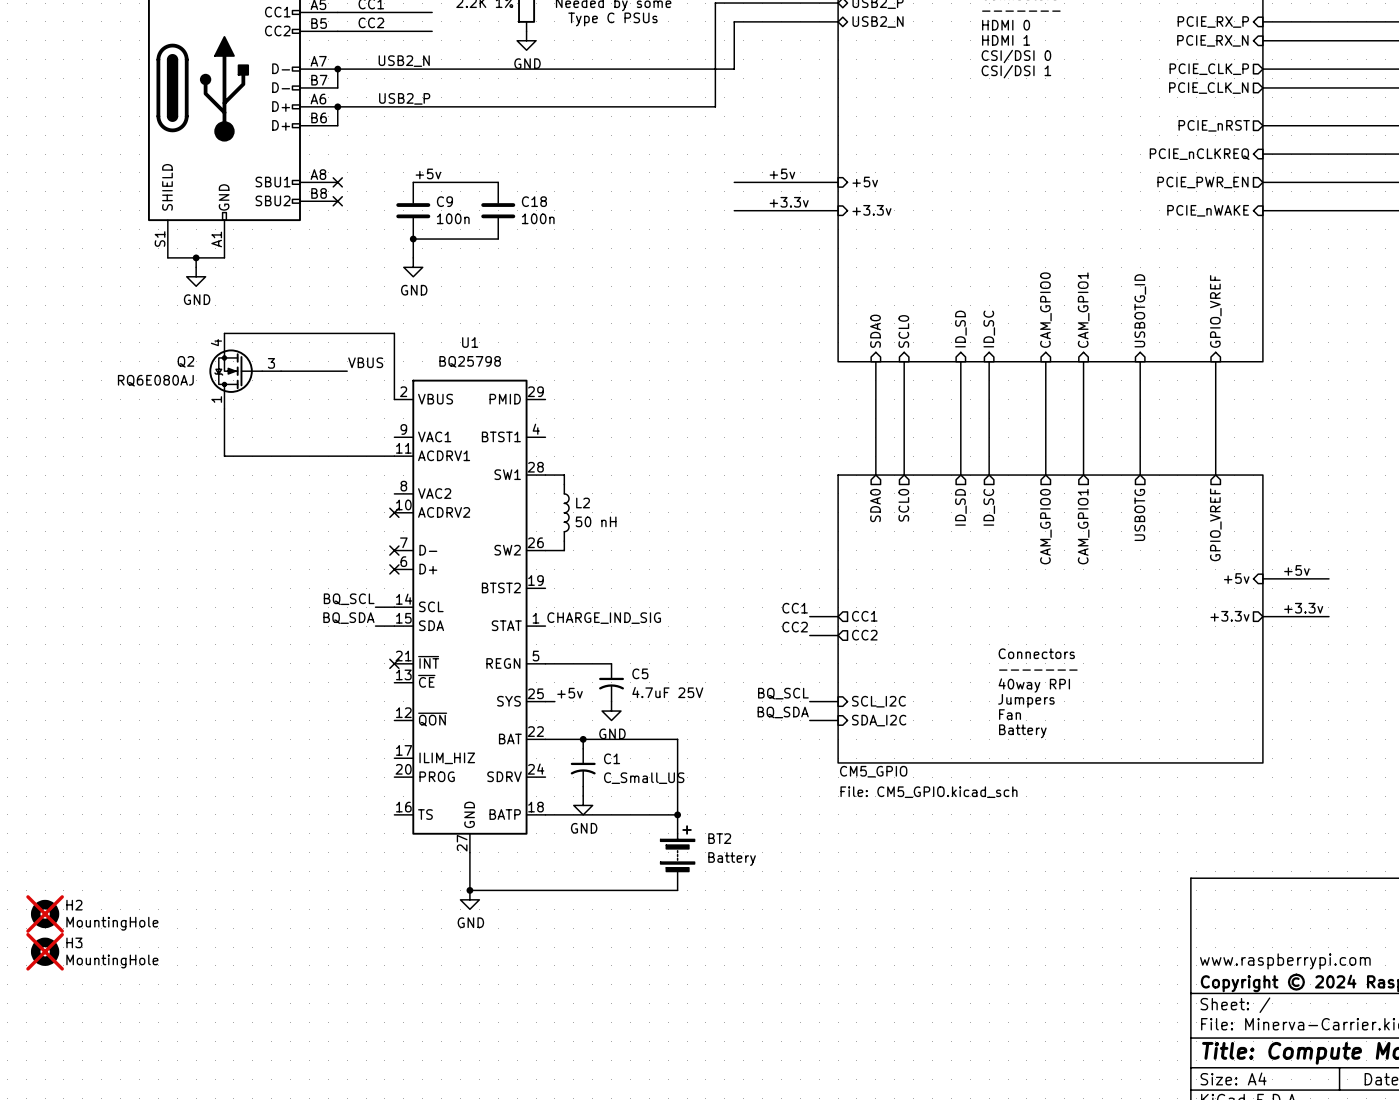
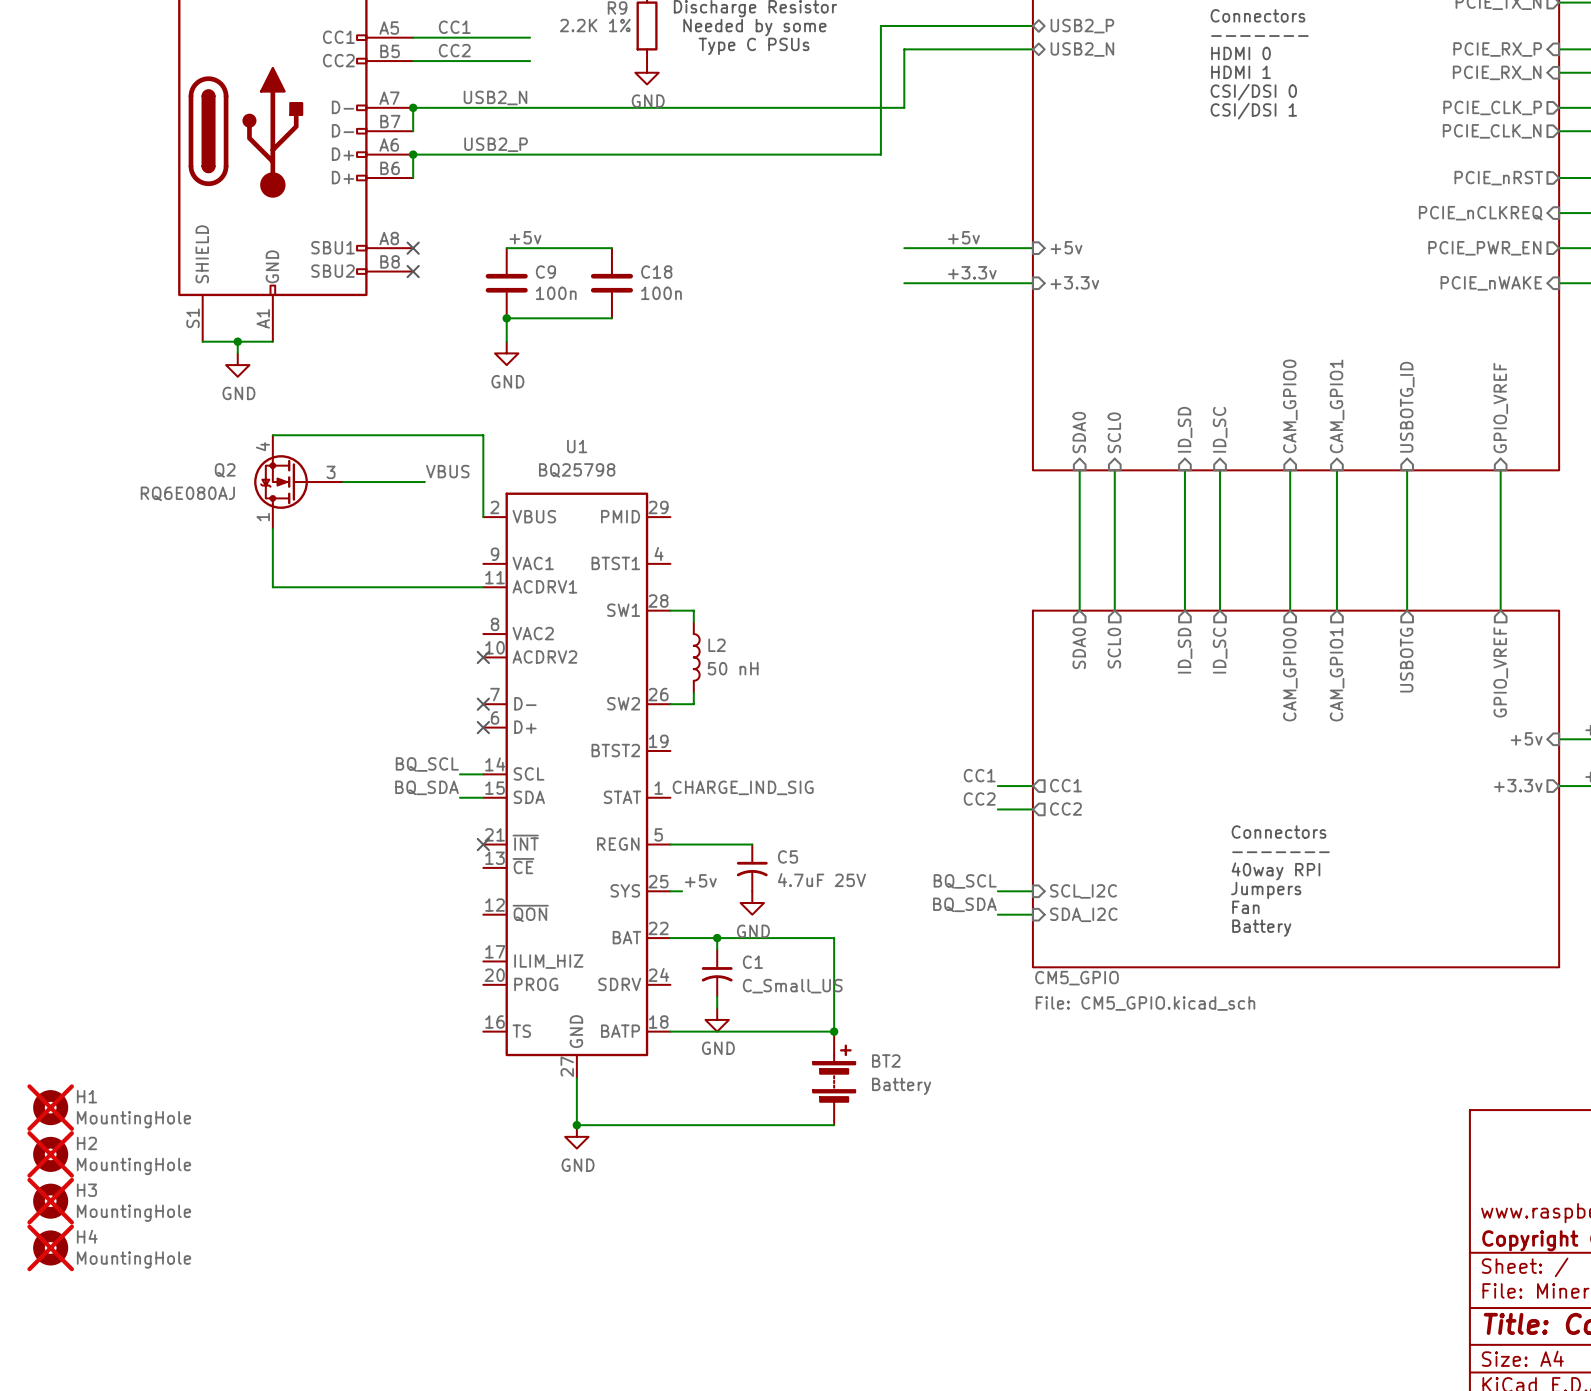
H1: none -> MountingHole (50, 1107)
H4: none -> MountingHole (50, 1247)

